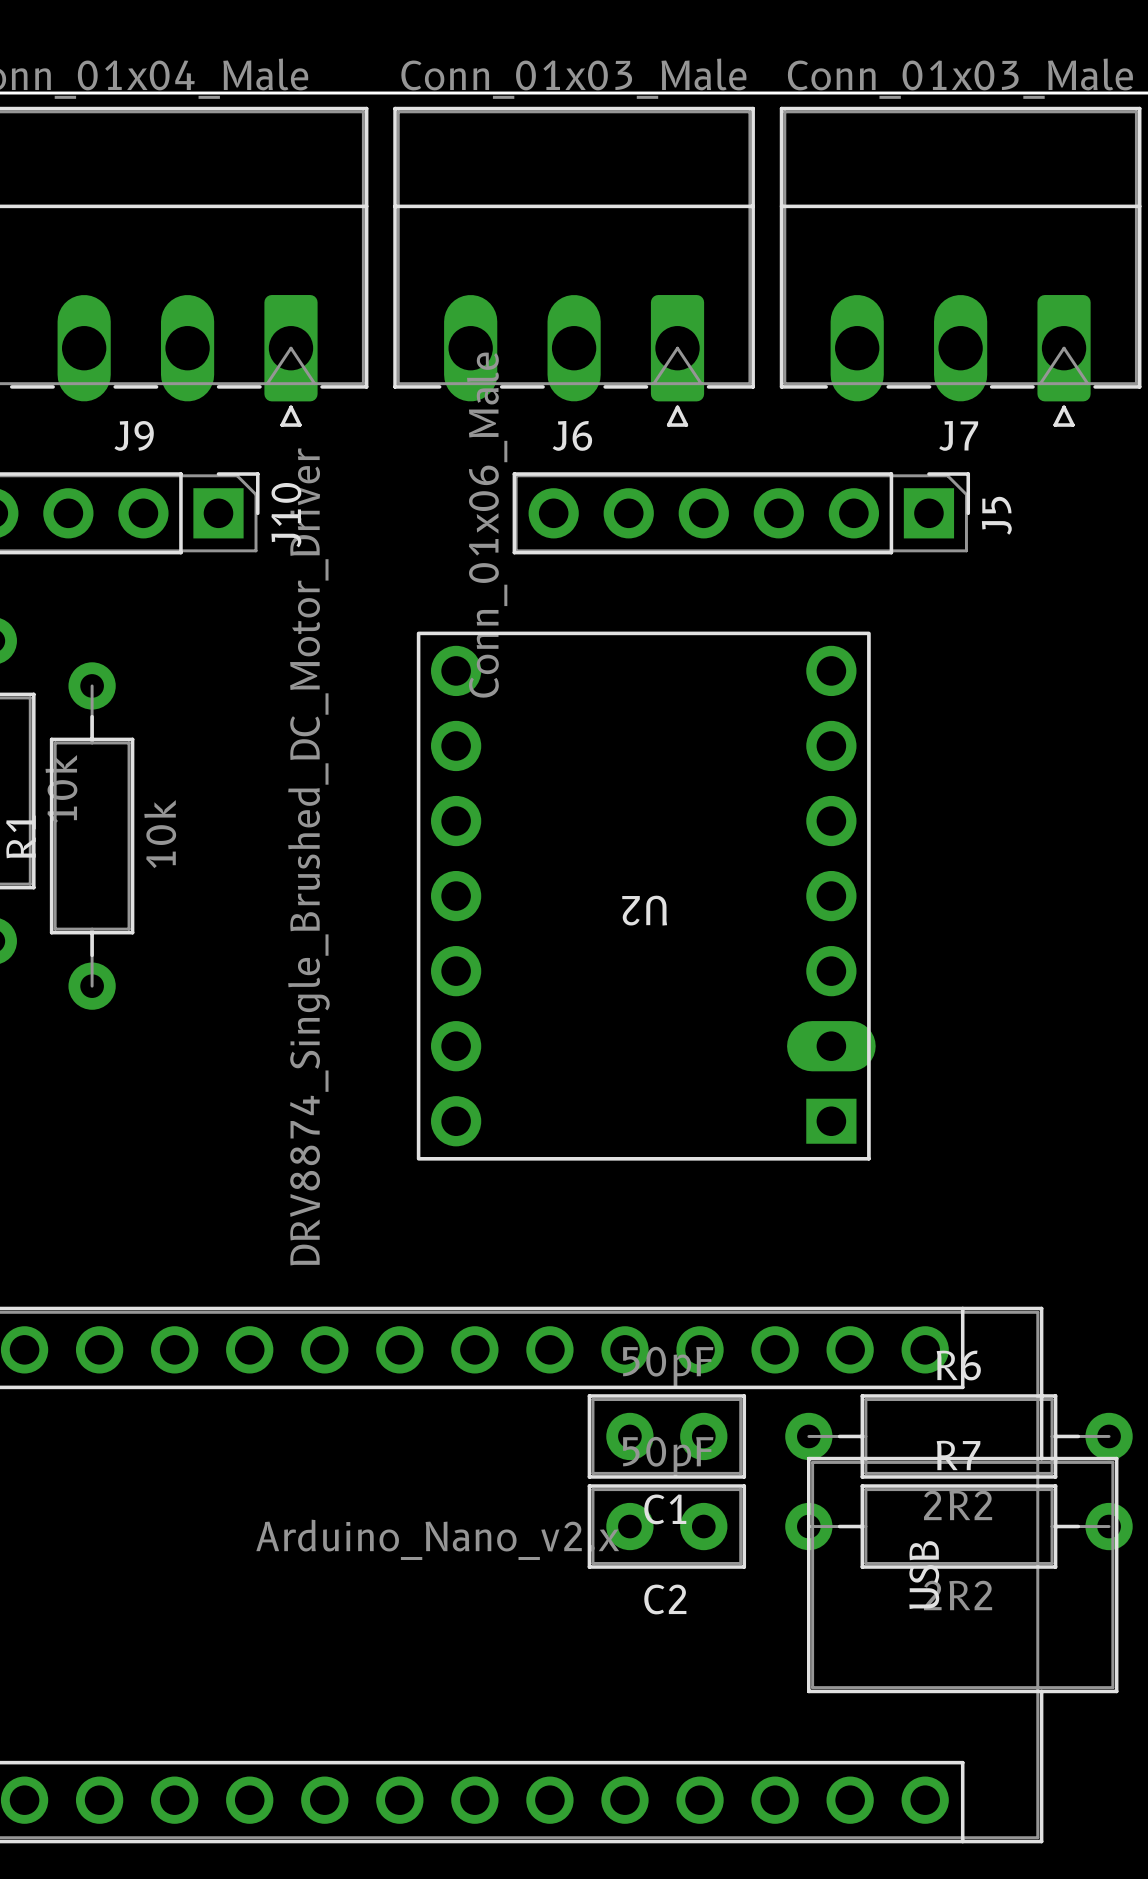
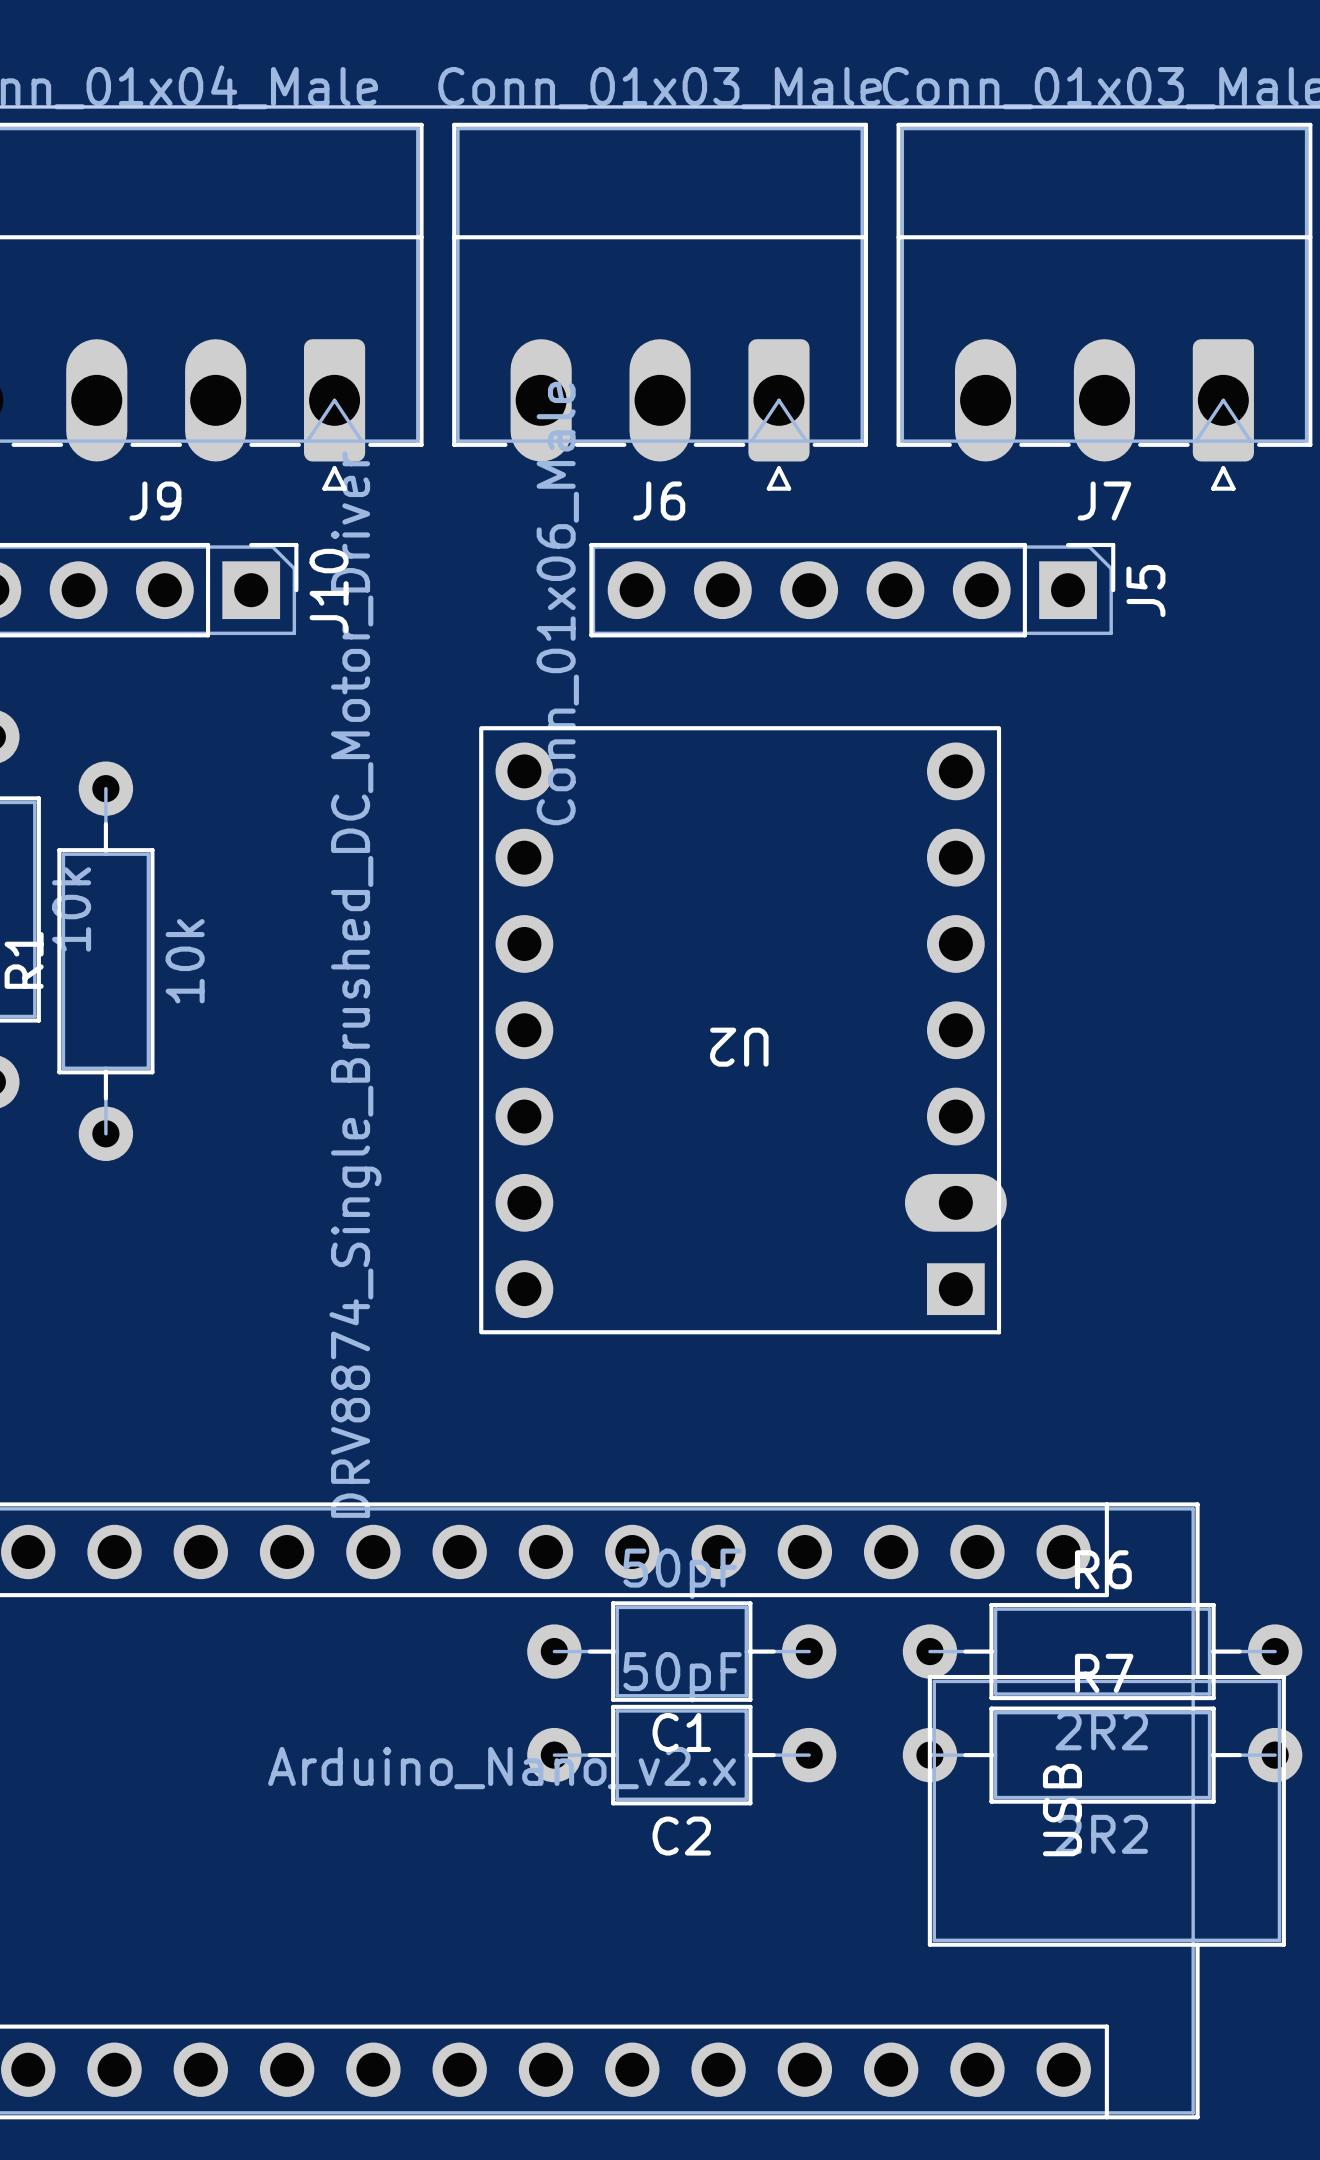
C1 footprint: [587, 1394, 747, 1479] -> [527, 1601, 837, 1702]
C2 footprint: [587, 1484, 747, 1569] -> [527, 1704, 837, 1806]

